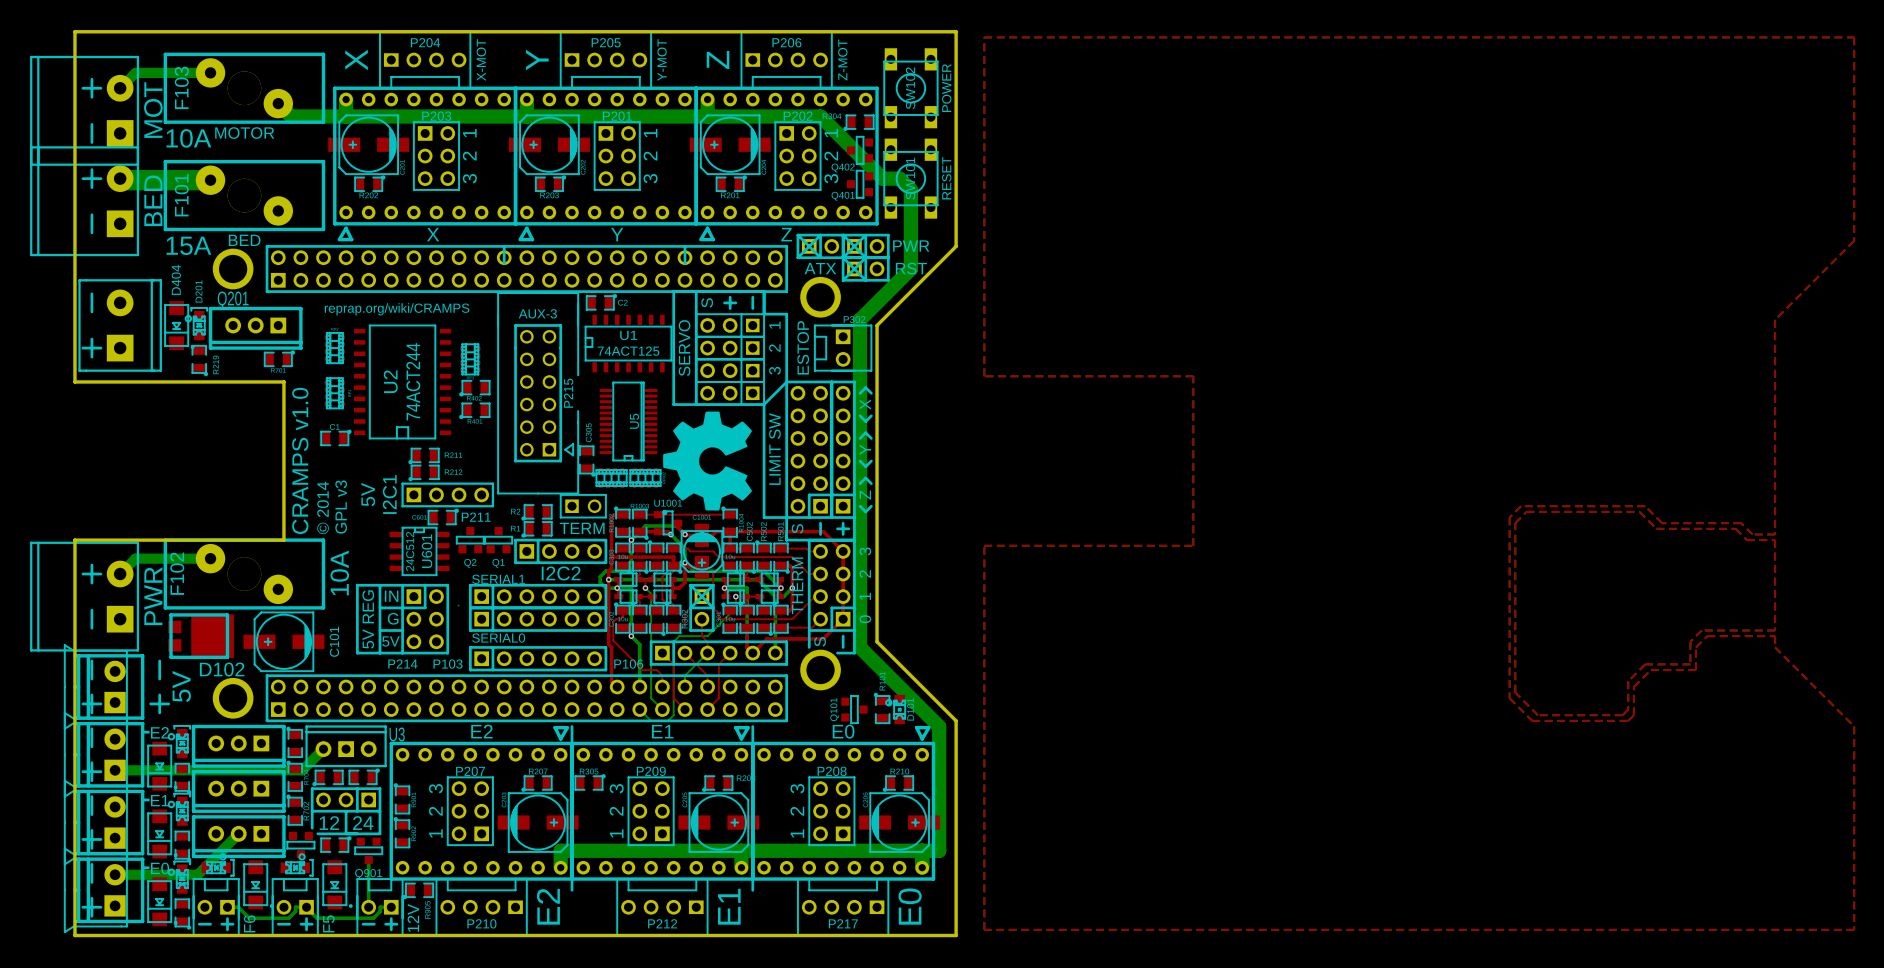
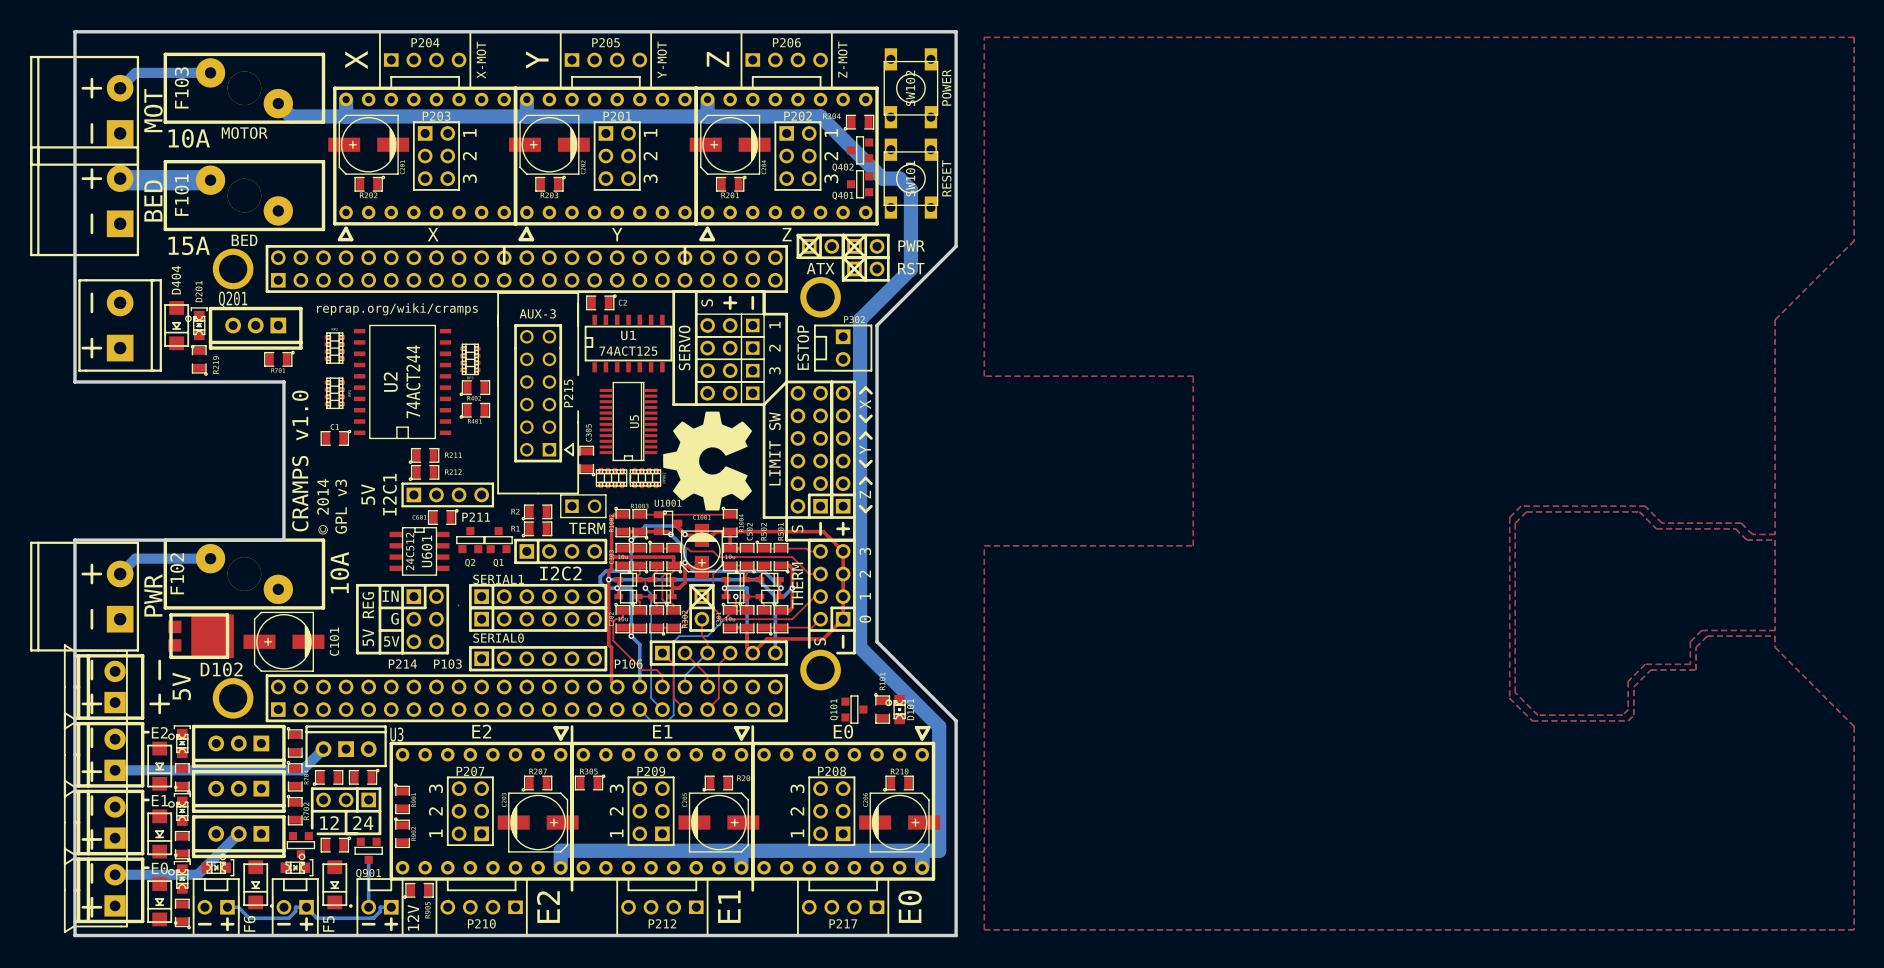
text: reprap.org/wiki/CRAMPS (397, 309) -> reprap.org/wiki/cramps (397, 309)

